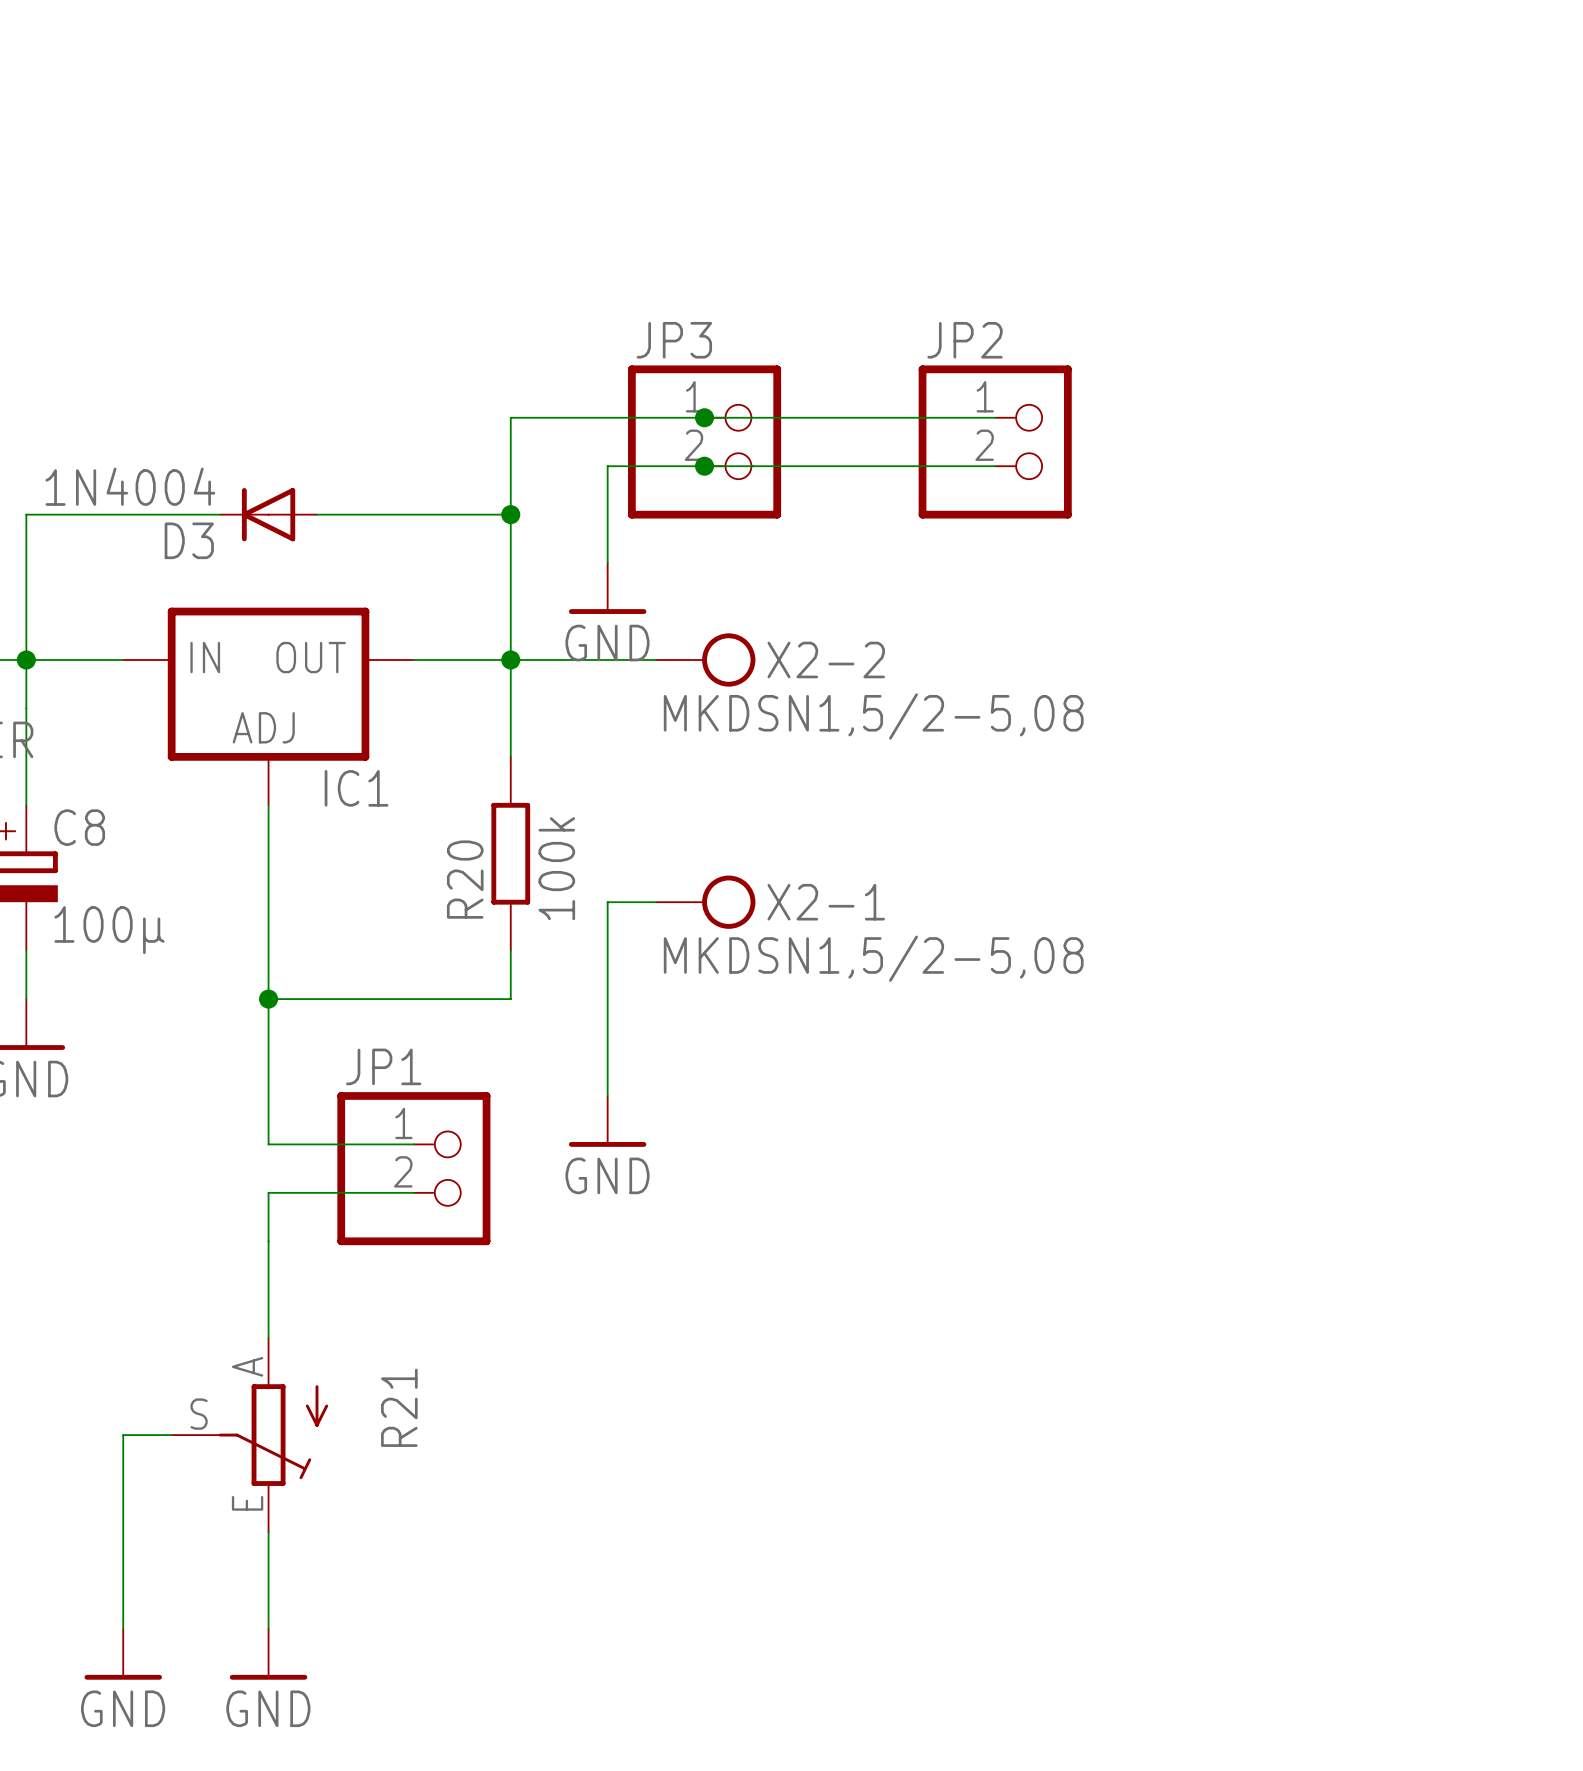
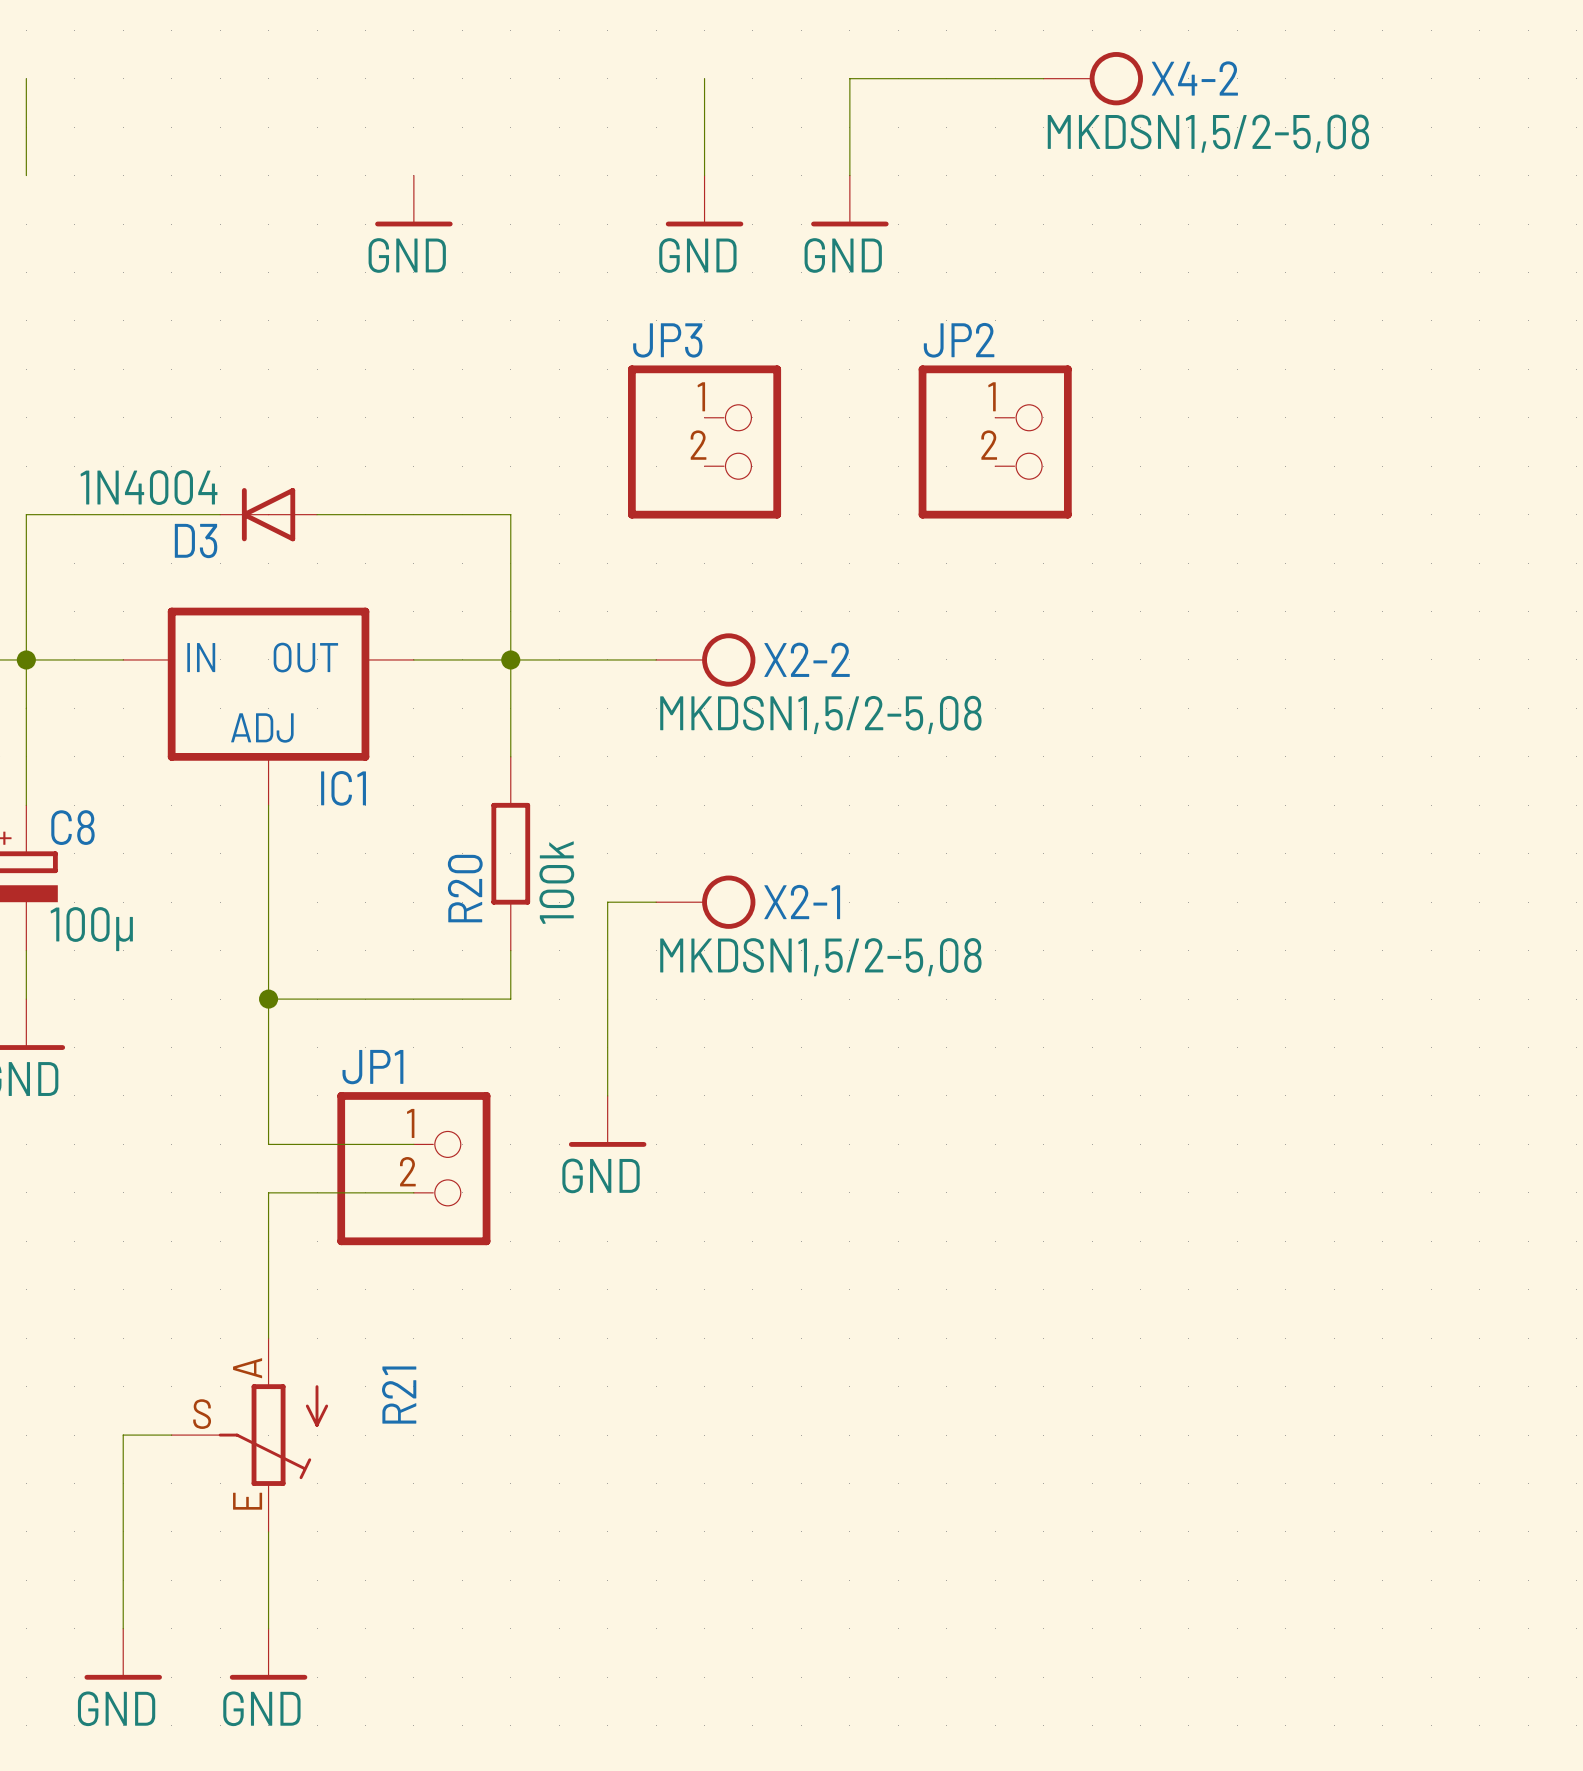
wire: none -> (26, 78) (26, 175)
wire: none -> (704, 78) (704, 175)
wire: none -> (1043, 78) (849, 78) (849, 175)
X4-2: none -> MKDSN1,5/2-5,08 (1093, 78)
power symbol: none -> GND (413, 200)
power symbol: none -> GND (704, 200)
power symbol: none -> GND (849, 200)
junction: (704, 417) -> none
wire: (995, 417) (510, 417) (510, 514) -> none
junction: (704, 466) -> none
wire: (995, 466) (607, 466) (607, 563) -> none
junction: (510, 514) -> none
power symbol: GND (607, 588) -> none

